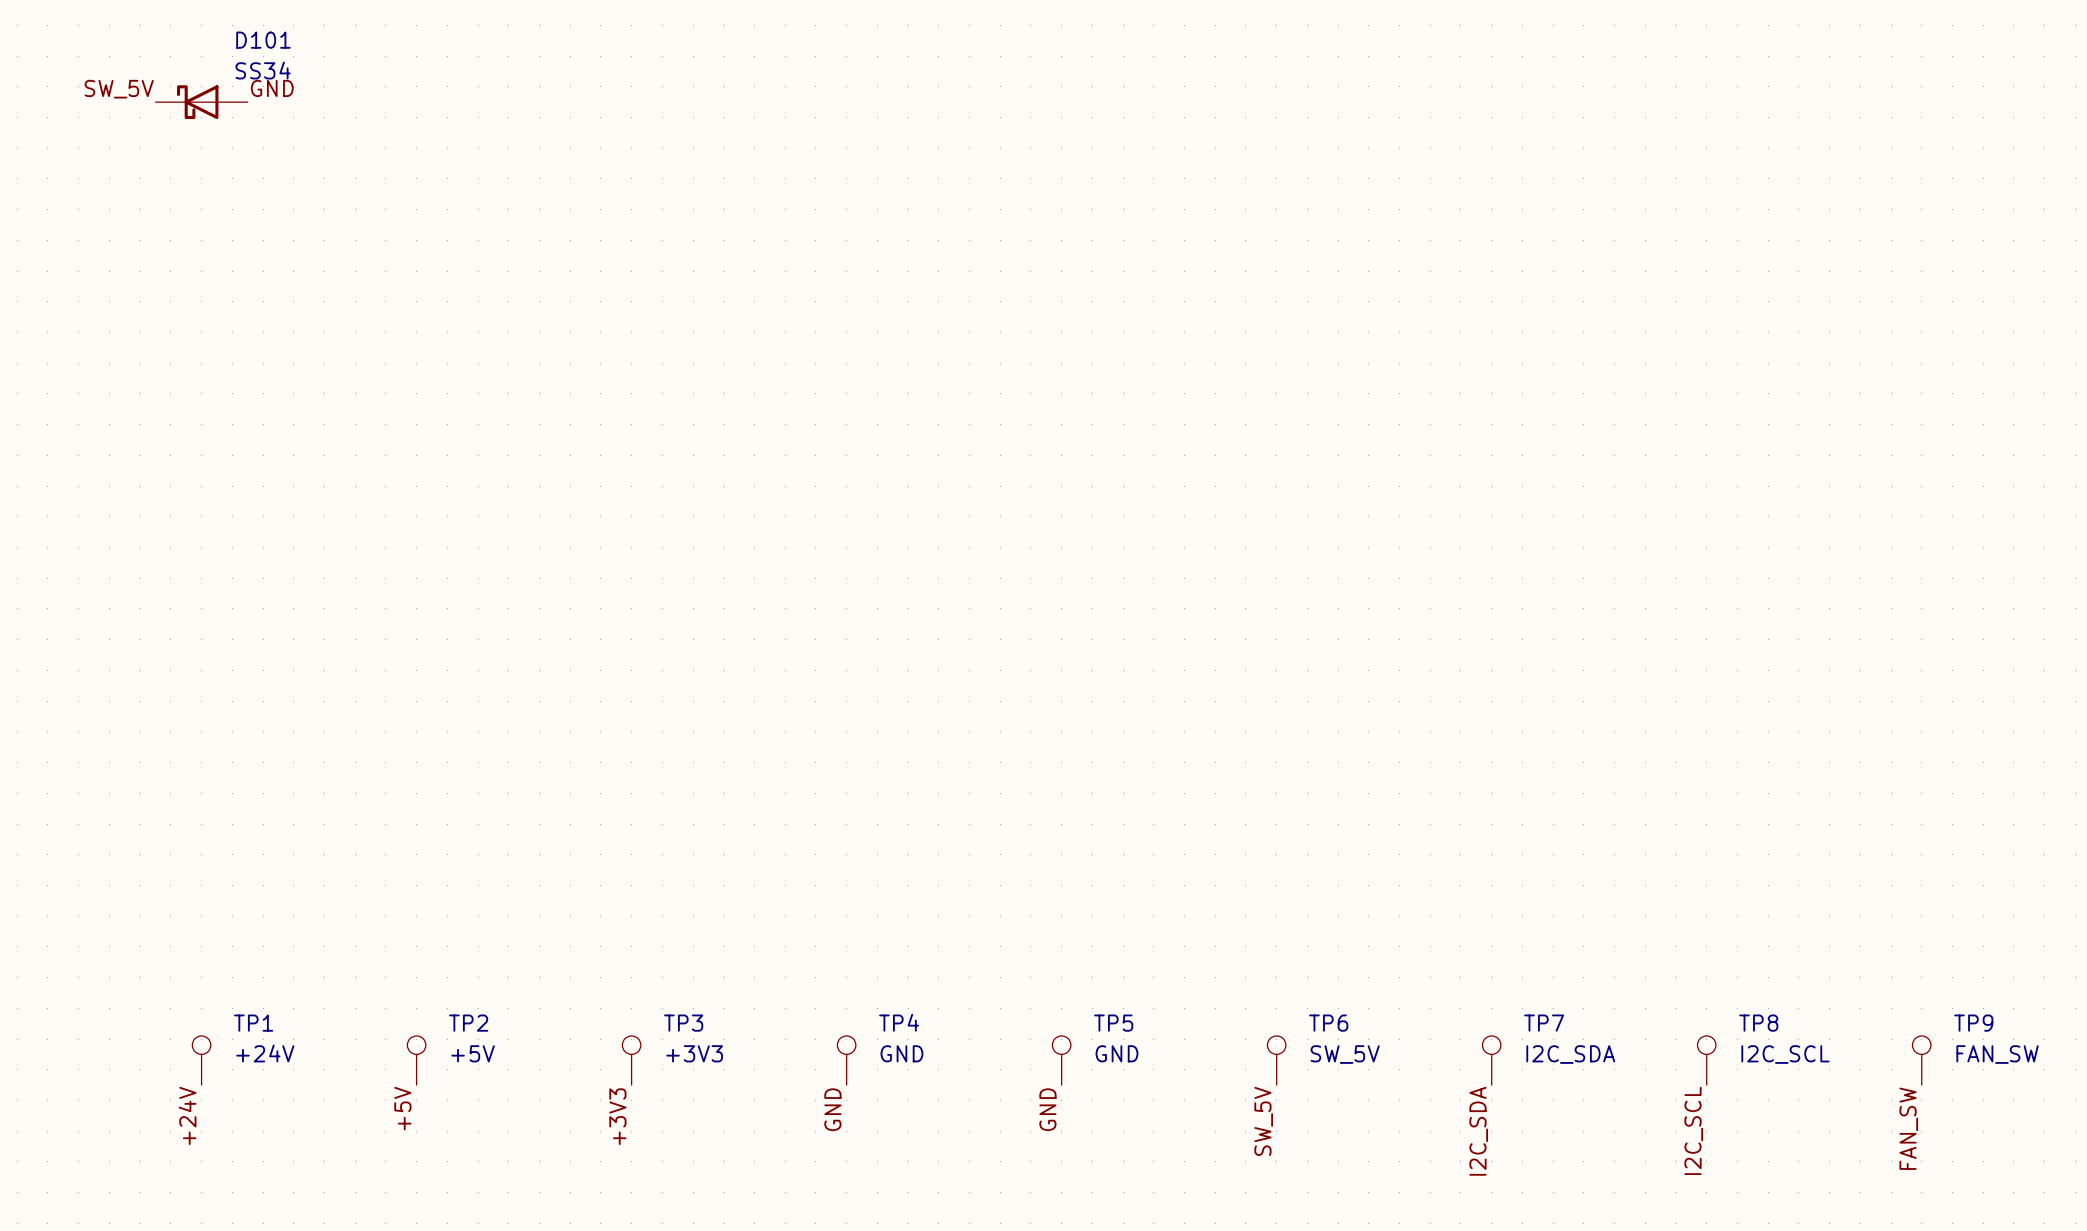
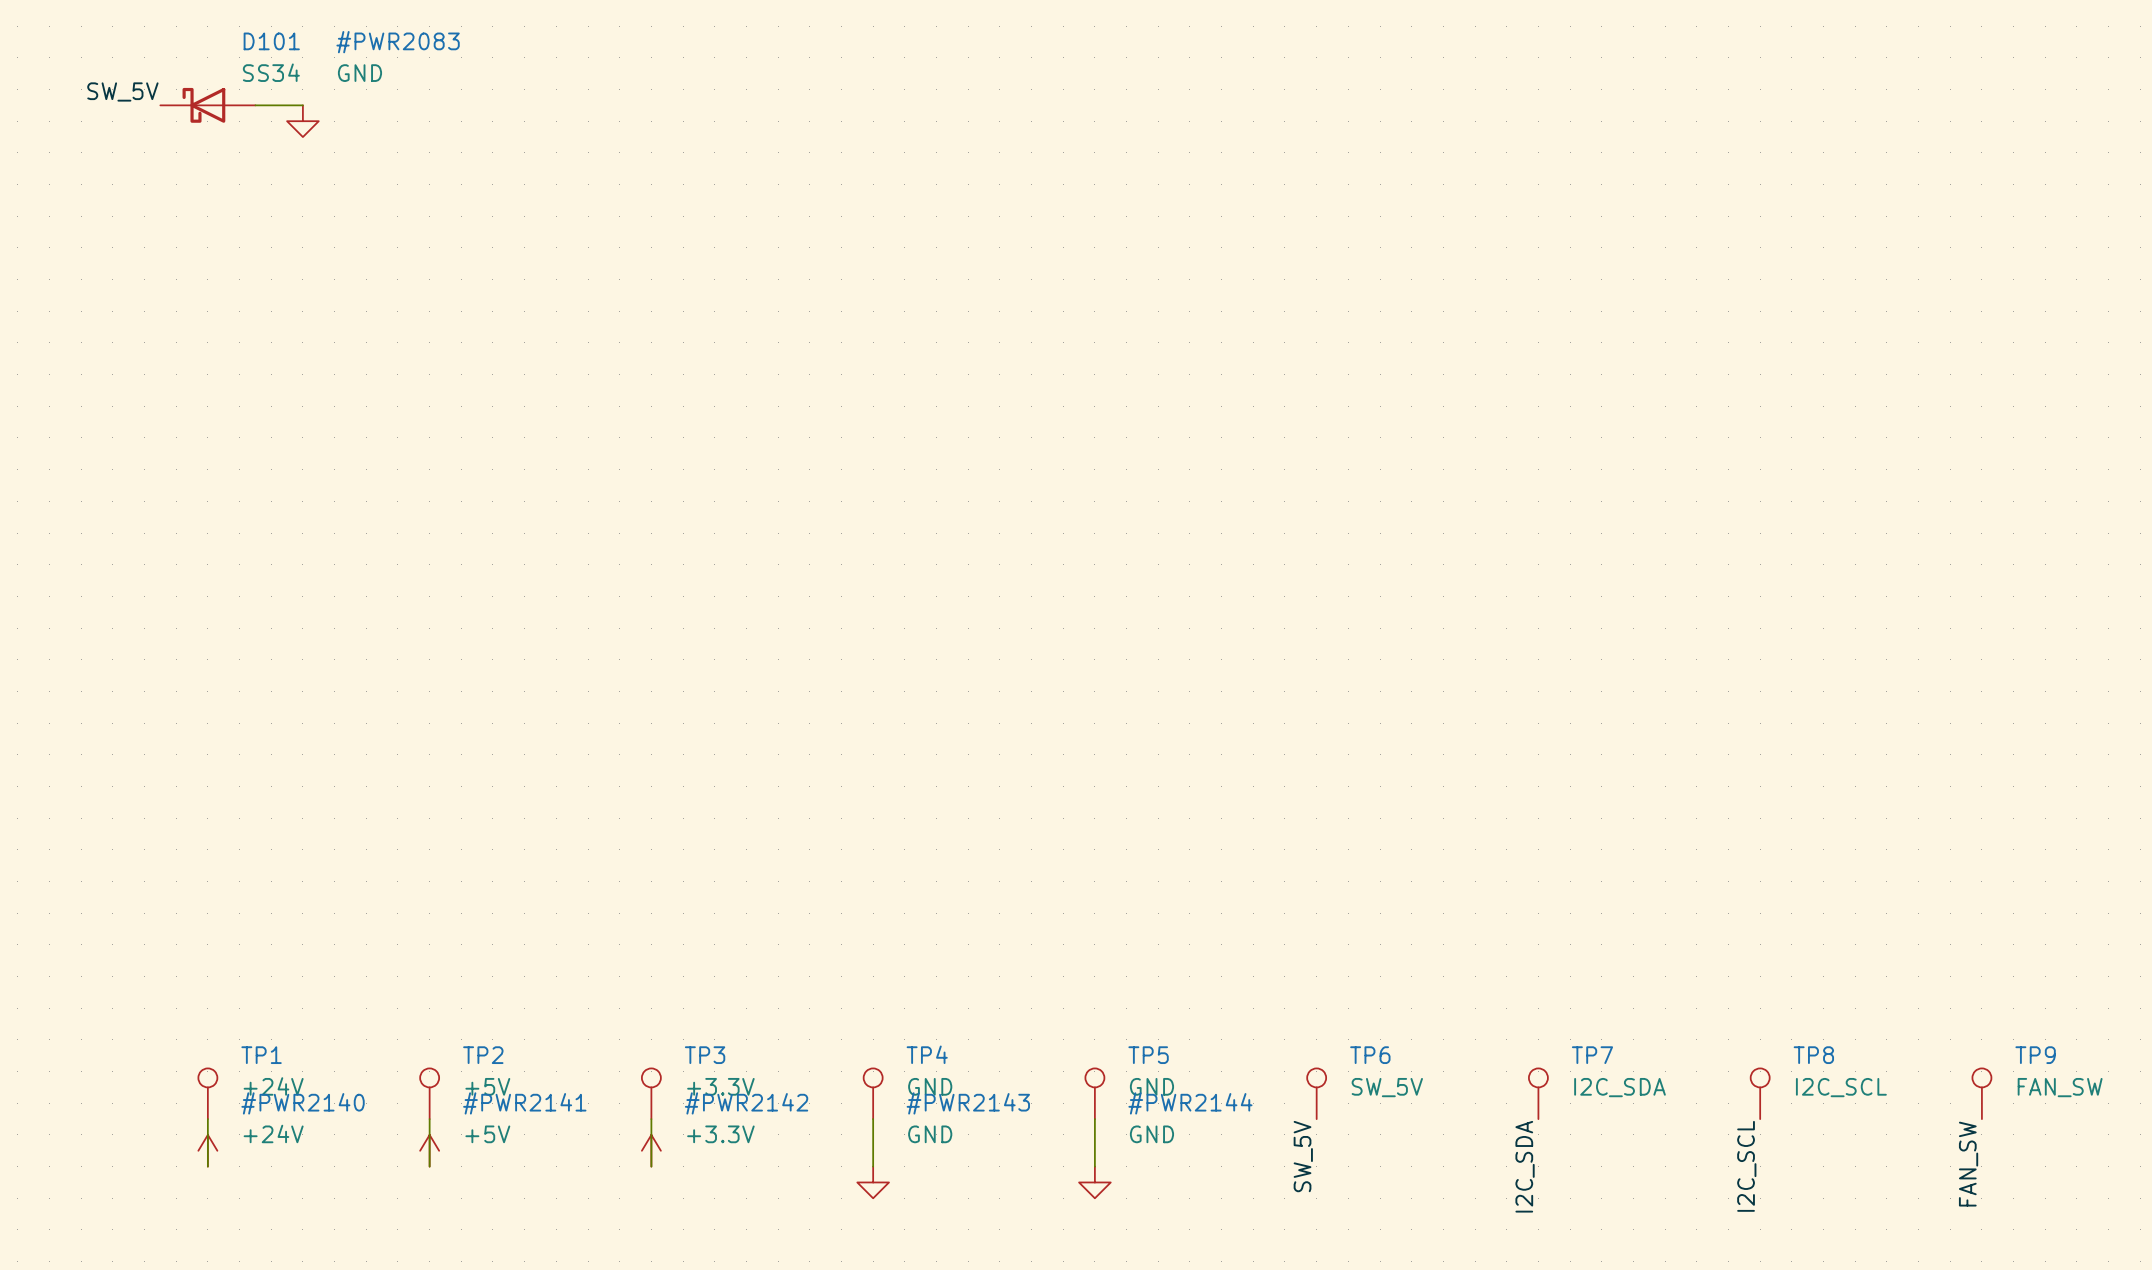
label: GND (272, 88) -> none
wire: none -> (255, 105) (302, 105)
#PWR2083: none -> GND (302, 121)
TP3 value: +3V3 (694, 1053) -> +3.3V (720, 1086)
wire: none -> (207, 1119) (207, 1166)
wire: none -> (429, 1119) (429, 1166)
wire: none -> (651, 1119) (651, 1166)
wire: none -> (873, 1119) (873, 1166)
wire: none -> (1094, 1119) (1094, 1166)
label: +5V (402, 1108) -> none
label: GND (832, 1109) -> none
label: GND (1047, 1109) -> none
label: +24V (187, 1115) -> none
#PWR2140: none -> +24V (207, 1150)
#PWR2141: none -> +5V (429, 1150)
#PWR2142: none -> +3.3V (651, 1150)
label: +3V3 (617, 1116) -> none
#PWR2143: none -> GND (873, 1182)
#PWR2144: none -> GND (1094, 1182)

